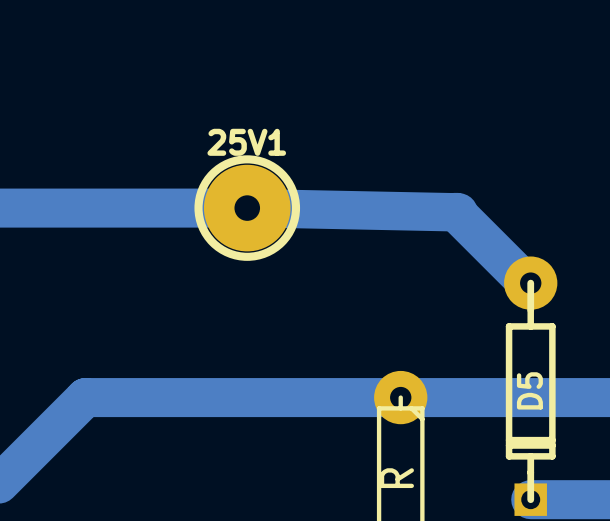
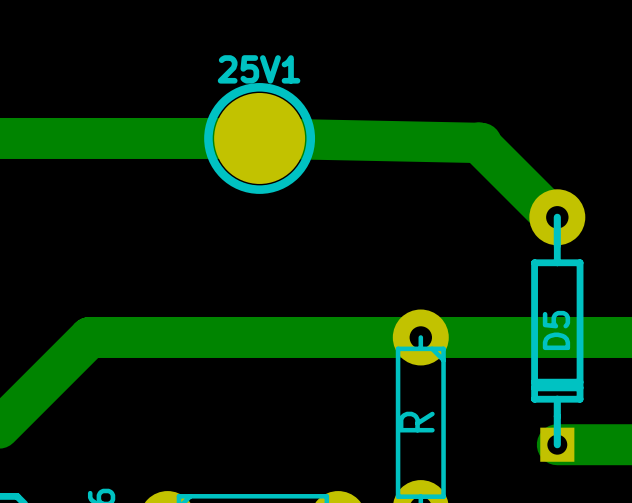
25V1 footprint: [194, 155, 301, 261] -> [204, 83, 316, 194]

